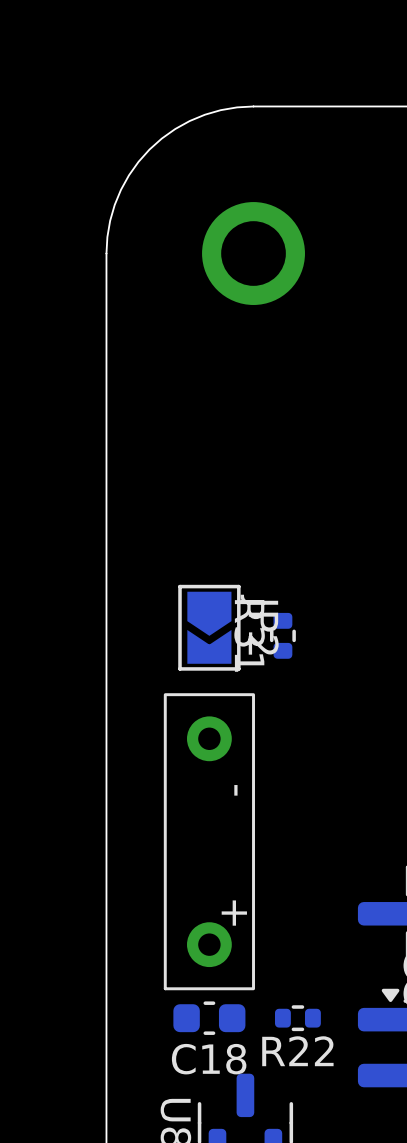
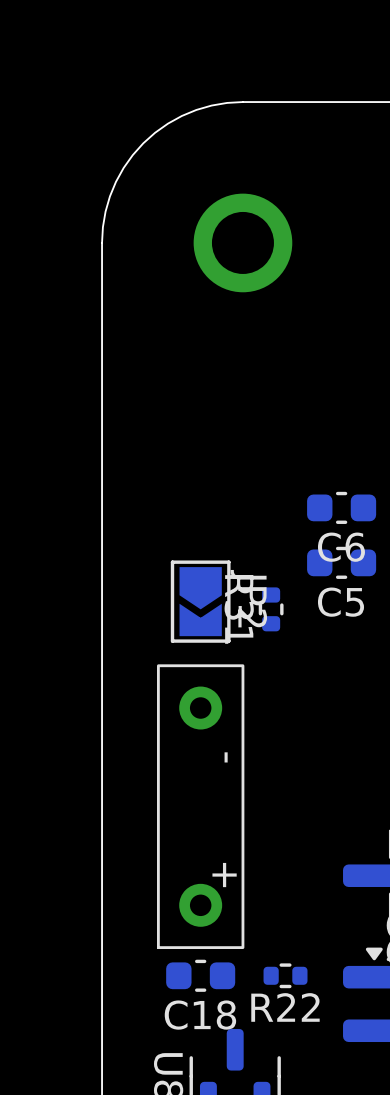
C6: none -> (341, 507)
C5: none -> (341, 562)

